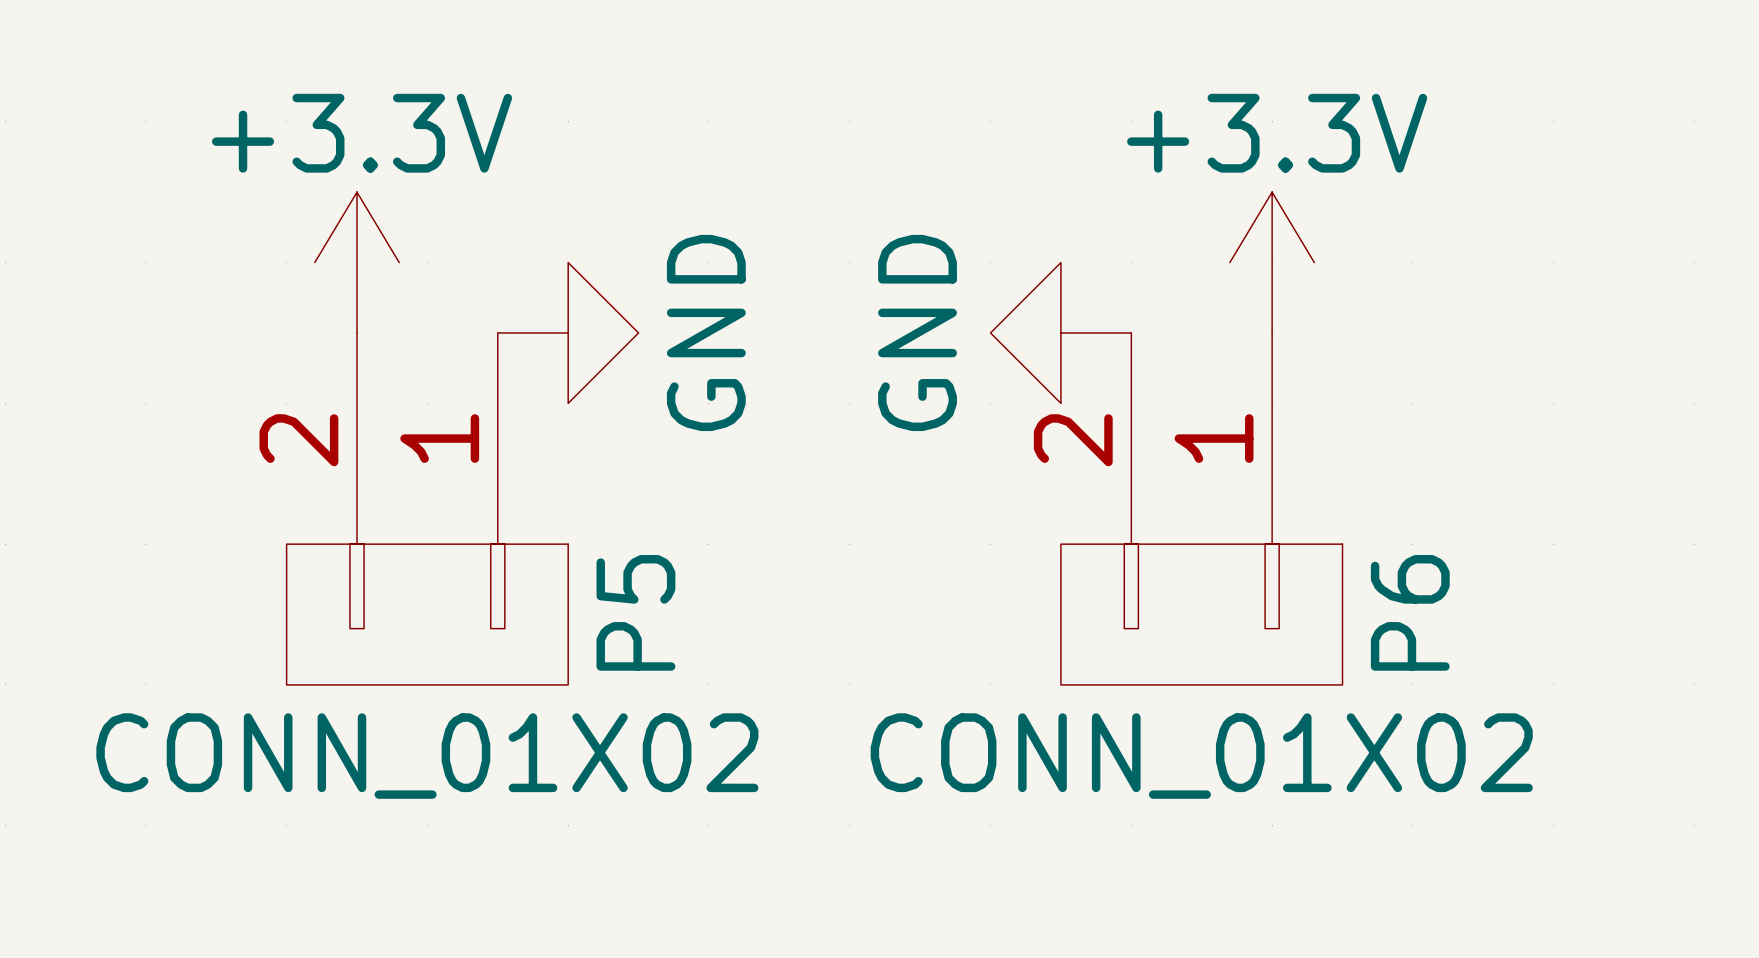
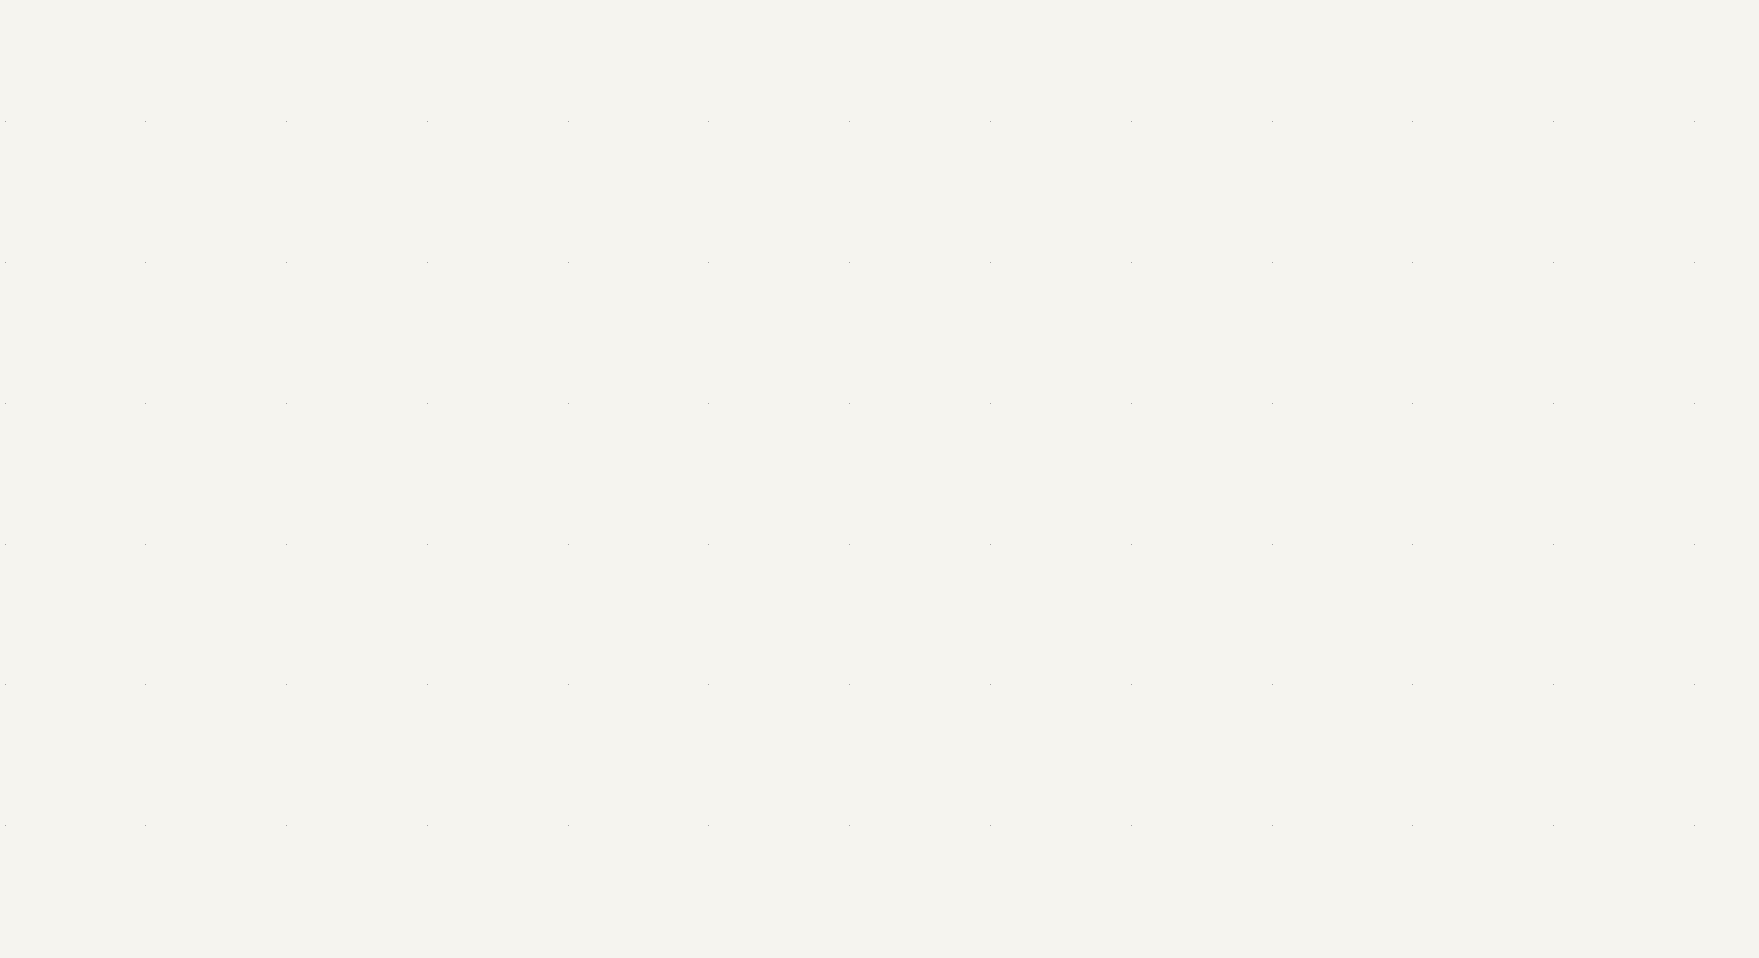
power symbol: +3.3V (357, 262) -> none
power symbol: +3.3V (1272, 262) -> none
power symbol: GND (568, 332) -> none
power symbol: GND (1060, 332) -> none
P5: CONN_01X02 (427, 508) -> none
P6: CONN_01X02 (1201, 508) -> none

